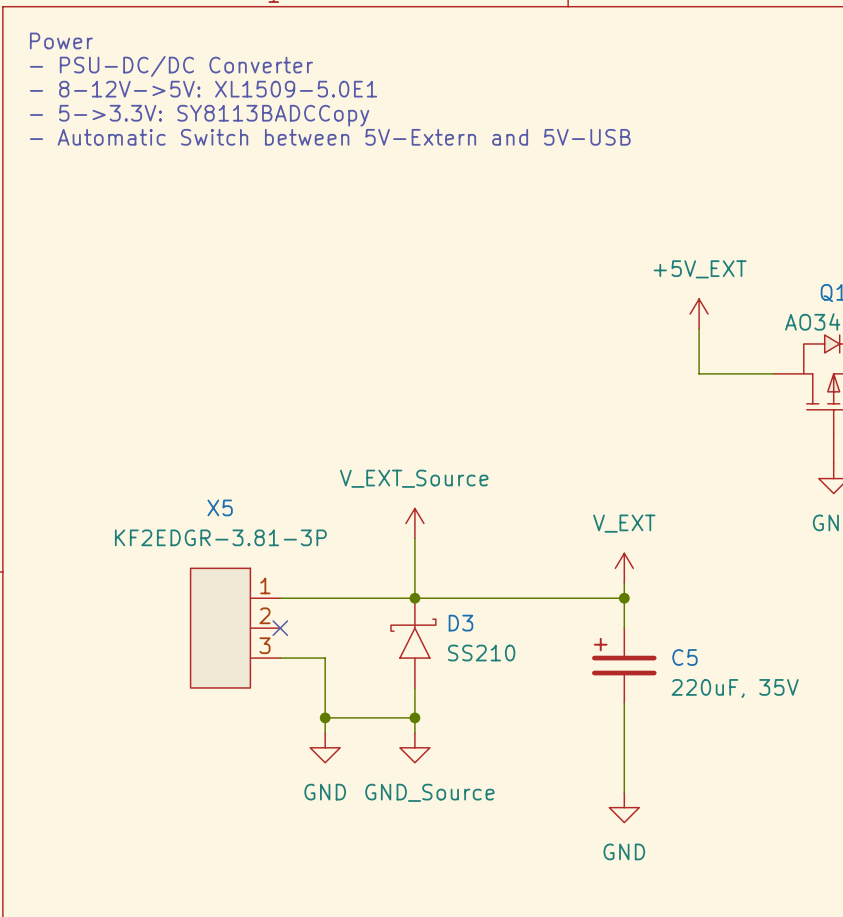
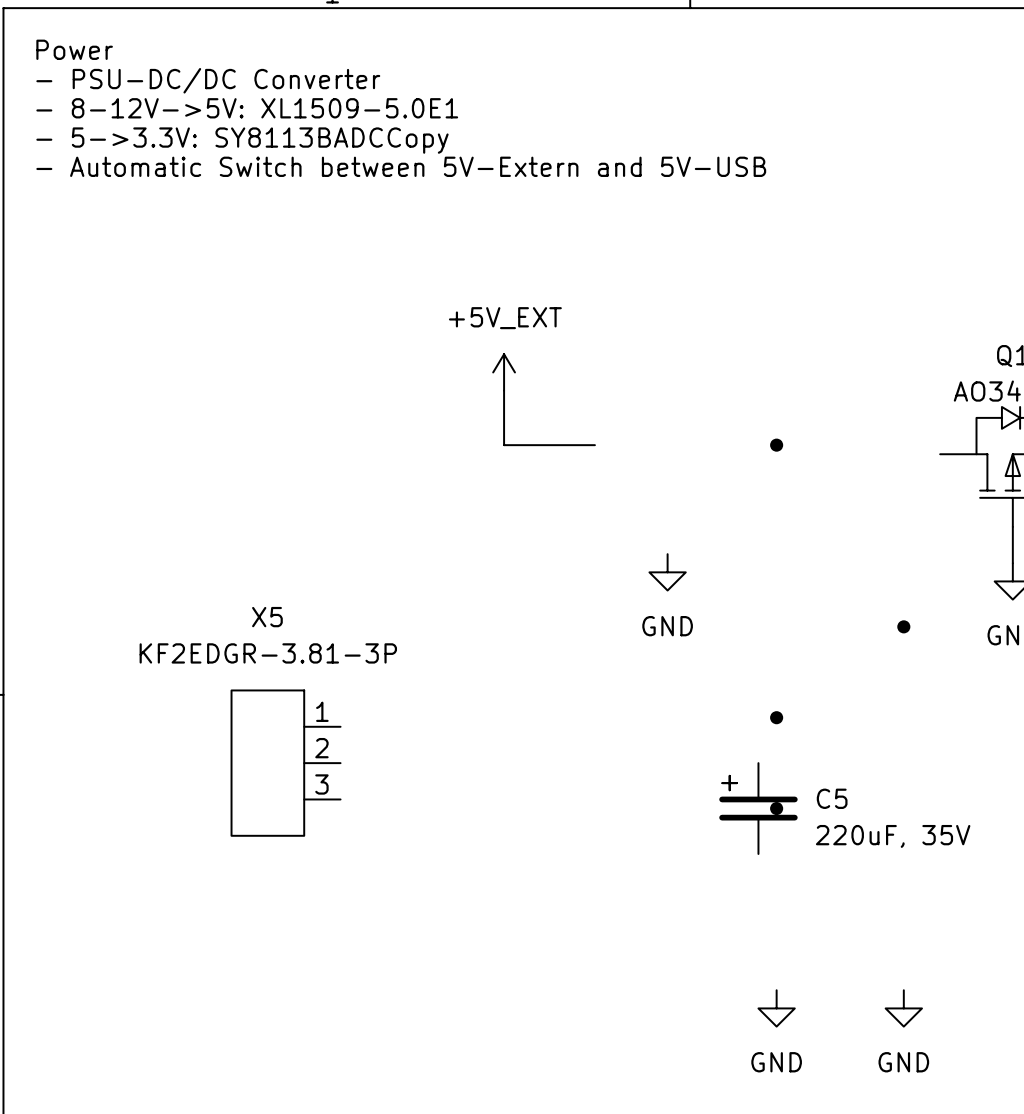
power symbol position: +5V_EXT (699, 314) -> +5V_EXT (504, 372)
wire: (699, 329) (699, 373) (773, 373) -> (504, 390) (504, 445) (594, 445)
junction: none -> (776, 445)
power symbol: none -> GND (667, 572)
junction: none -> (903, 626)
power symbol: V_EXT_Source (414, 523) -> none
wire: (414, 538) (414, 598) -> none
power symbol: V_EXT (624, 568) -> none
wire: (624, 583) (624, 628) -> none
wire: (280, 598) (624, 598) -> none
junction: (414, 598) -> none
junction position: (624, 598) -> (776, 717)
no-connect mark: (280, 628) -> none
D3: SS210 (413, 643) -> none
wire: (280, 658) (325, 658) (325, 732) -> none
junction: none -> (776, 808)
wire: (414, 687) (414, 732) -> none
wire: (624, 702) (624, 792) -> none
wire: (325, 717) (414, 717) -> none
junction: (325, 717) -> none
junction: (414, 717) -> none
power symbol: GND (325, 747) -> none
power symbol: GND_Source (414, 747) -> none
power symbol position: GND (624, 807) -> GND (776, 1008)
power symbol: none -> GND (903, 1008)

